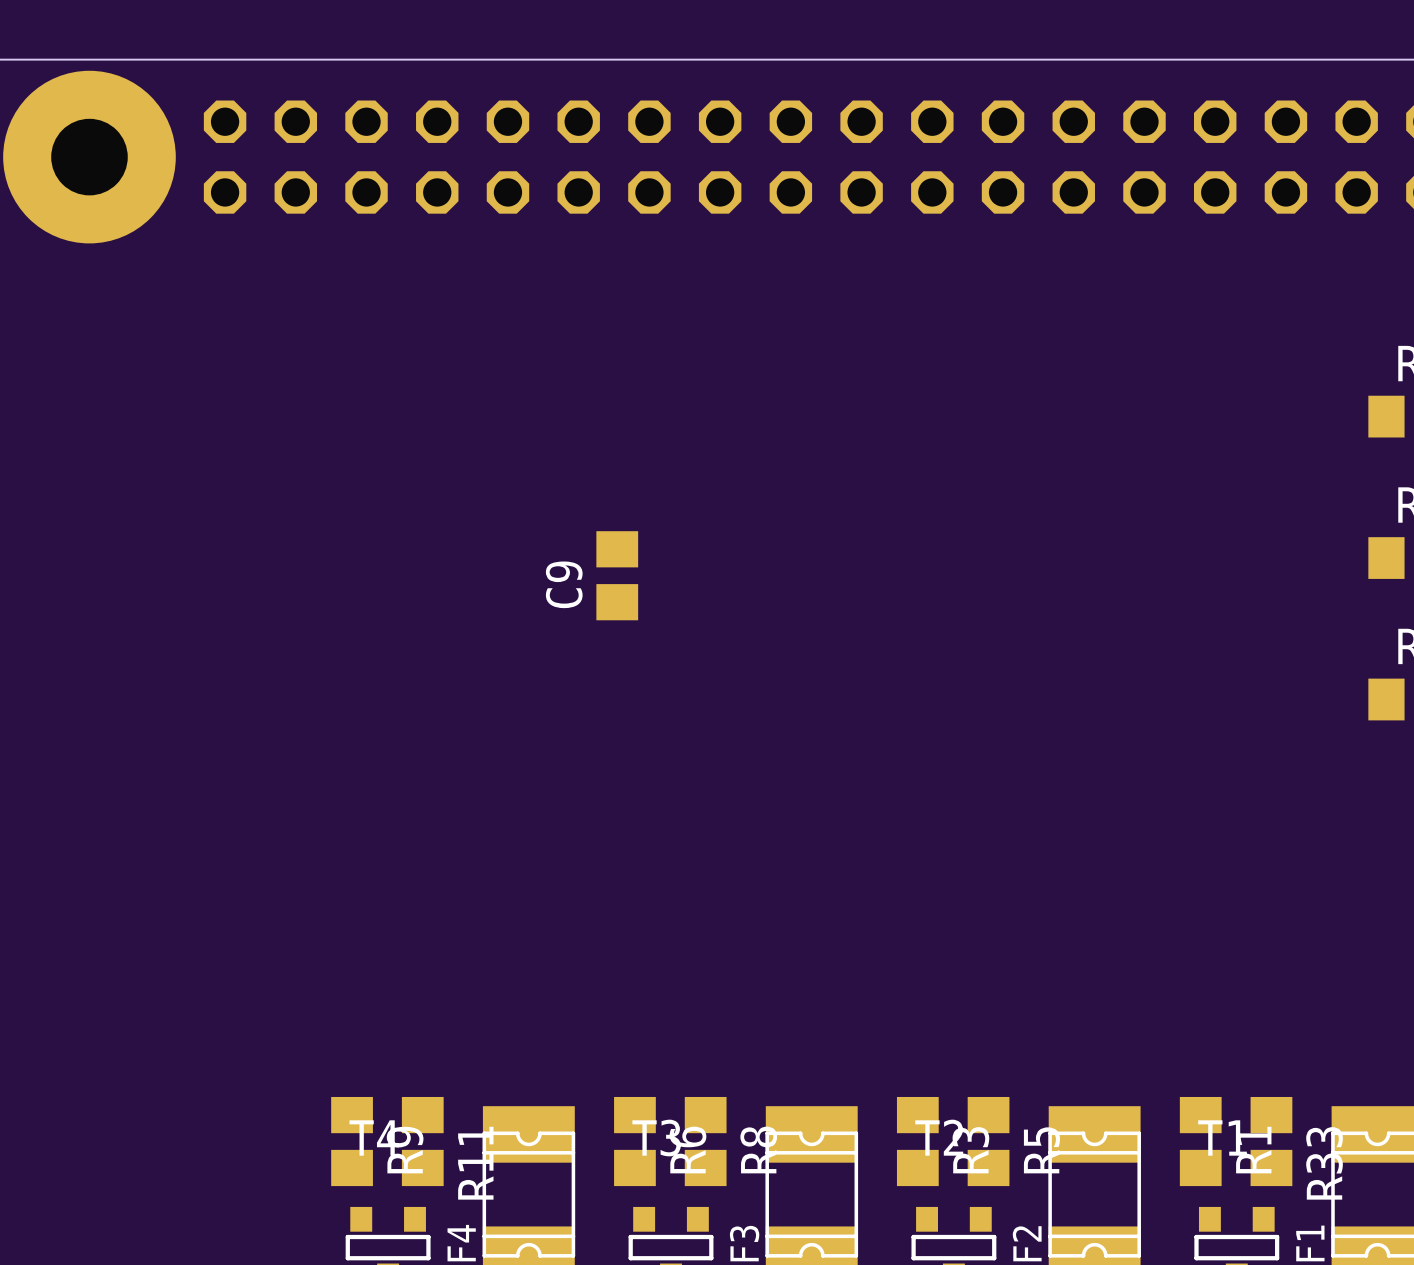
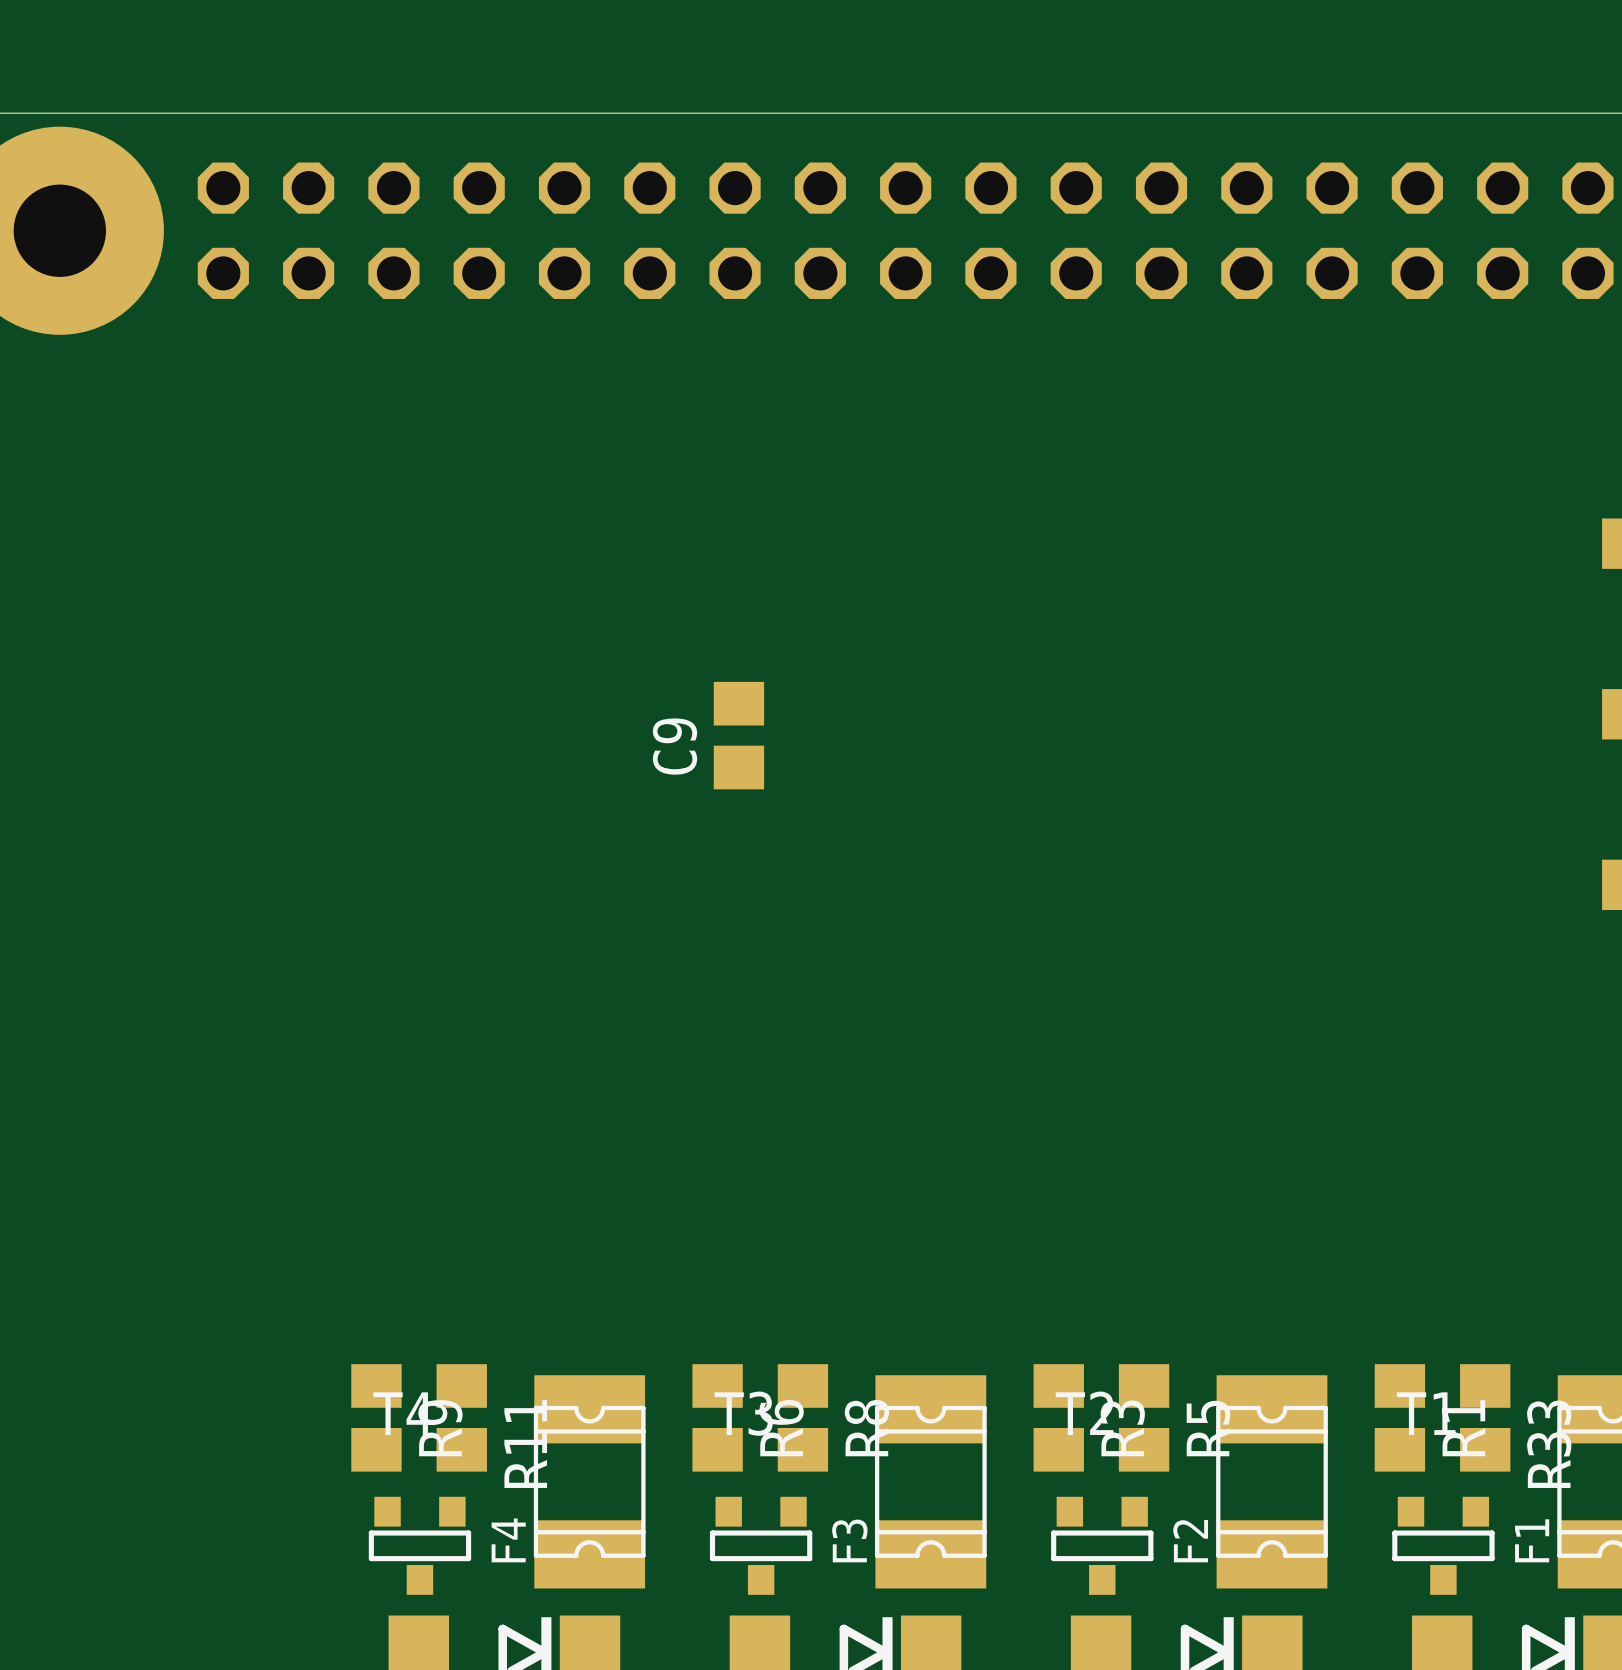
C9 position: (617, 575) -> (738, 735)

